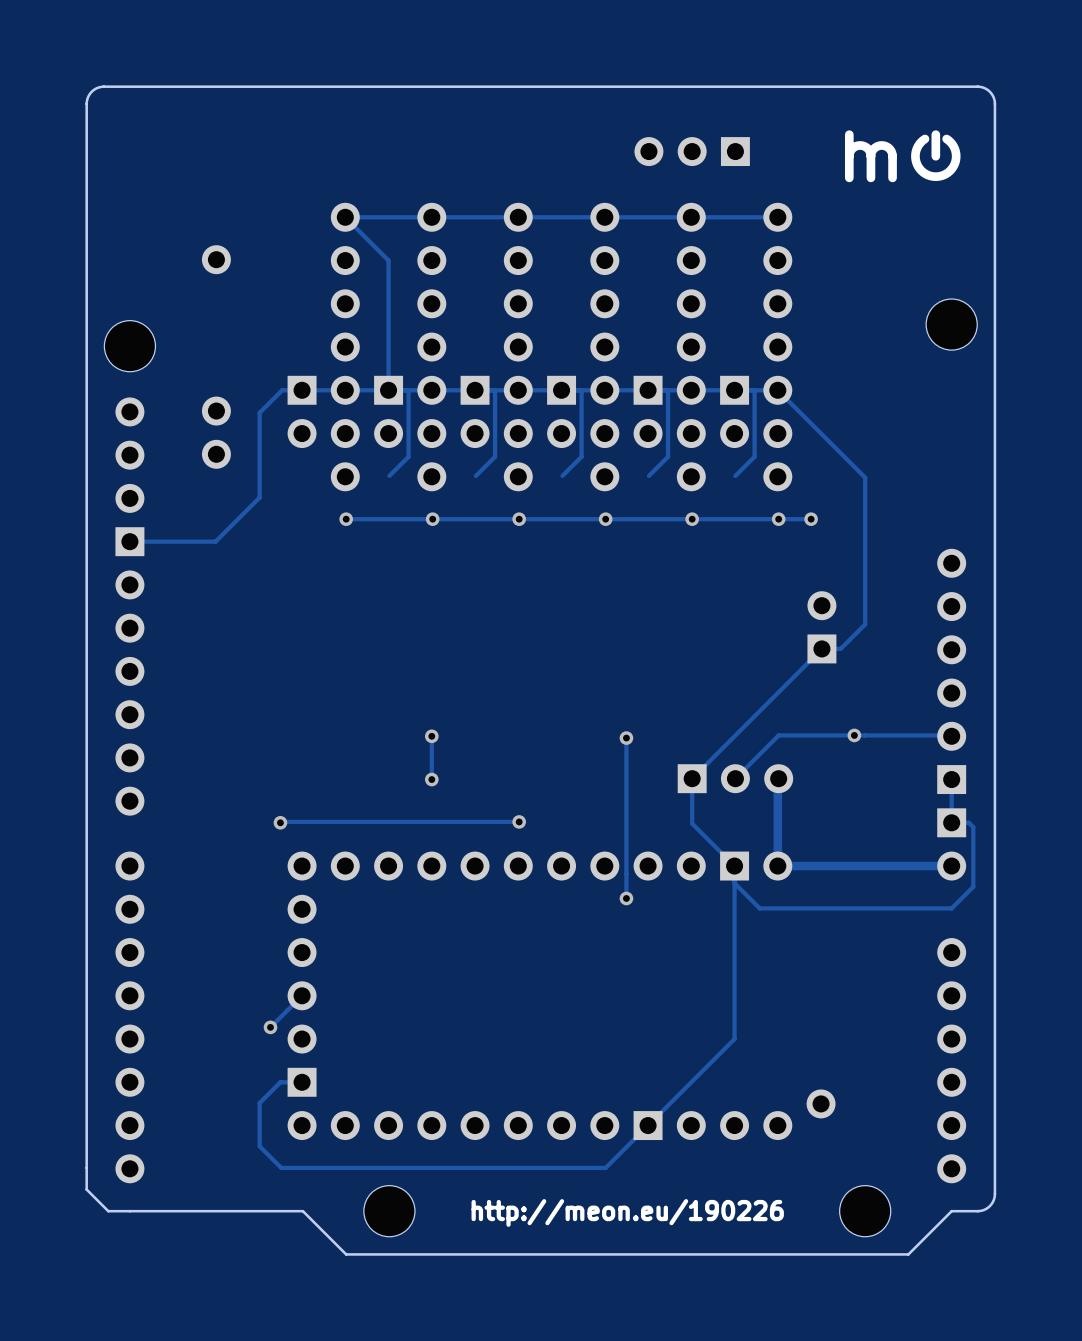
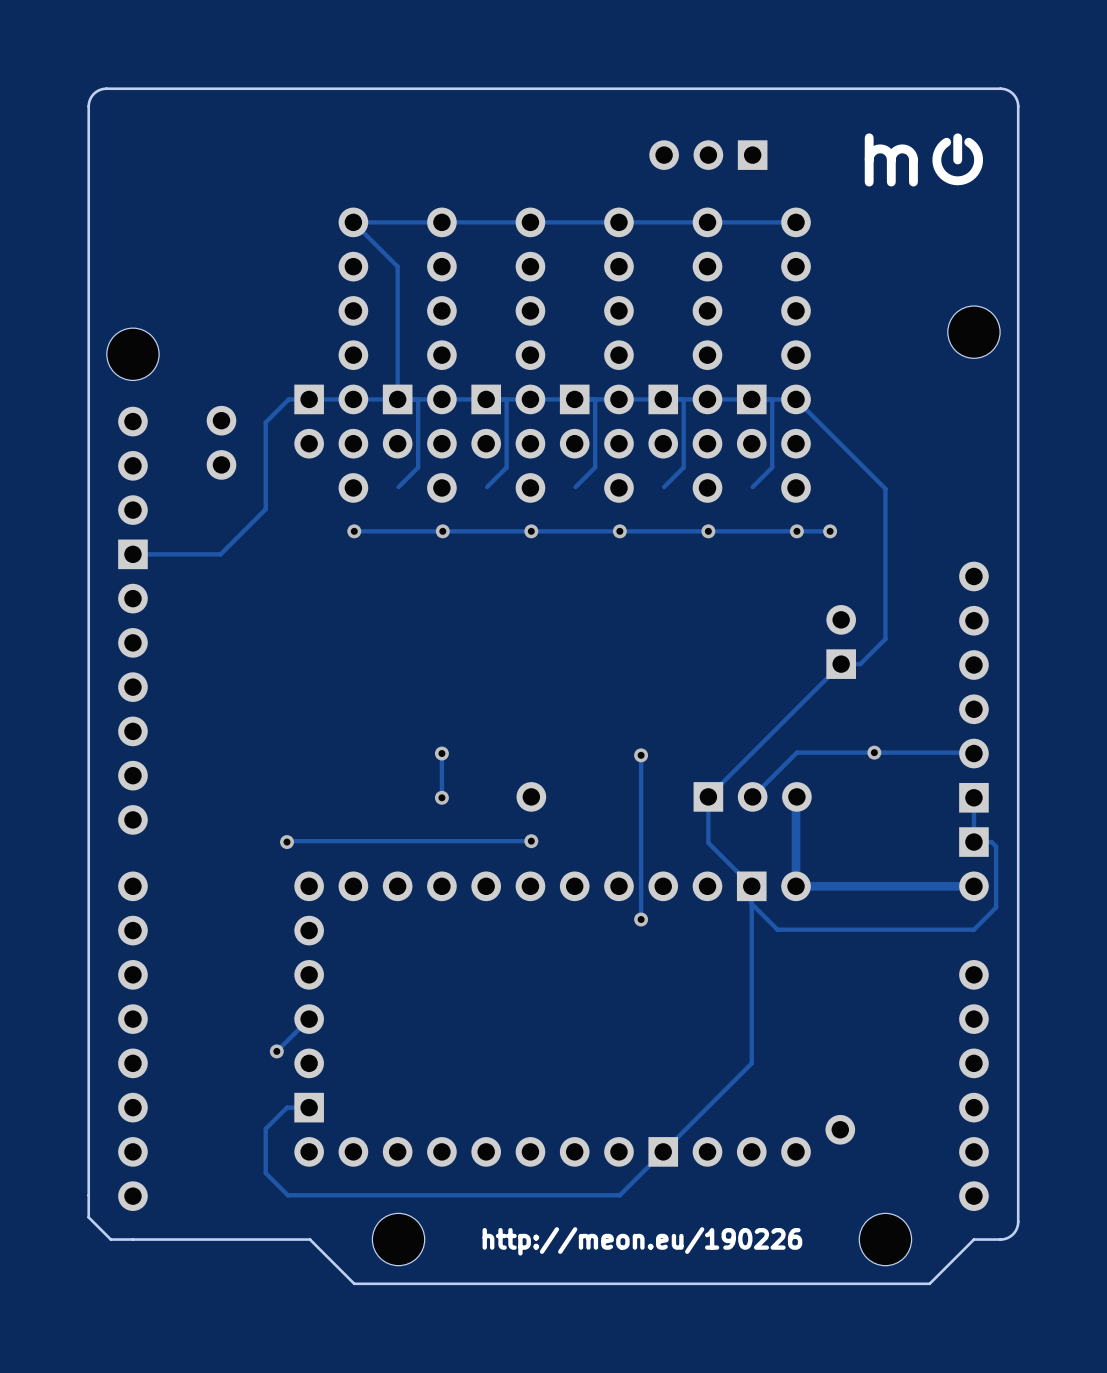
part: (216, 259) -> none
part: none -> (531, 796)

